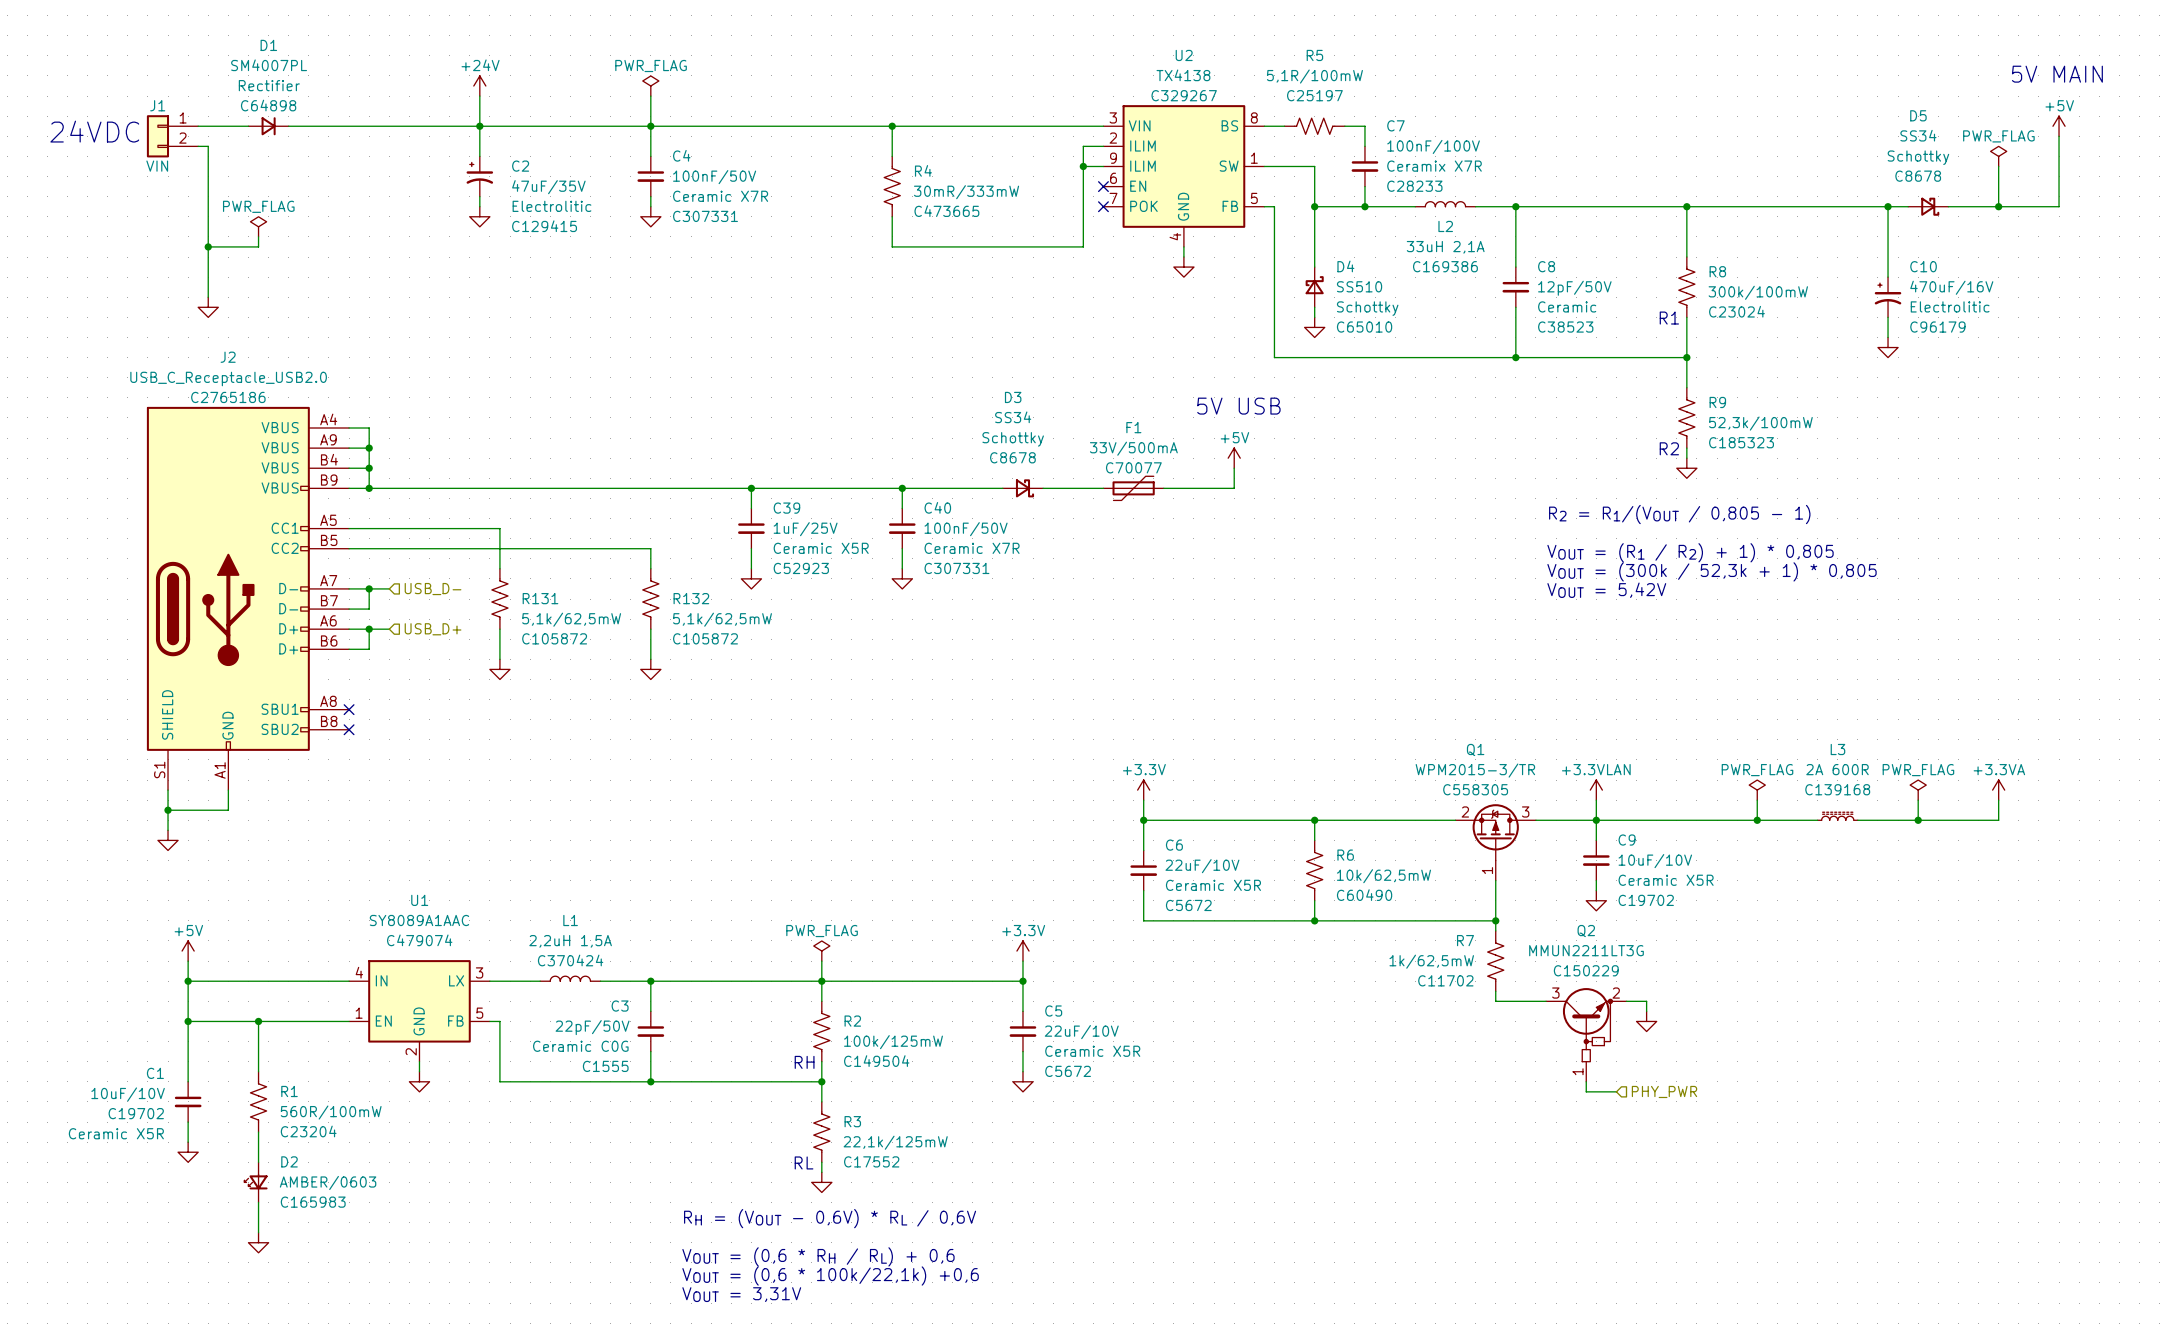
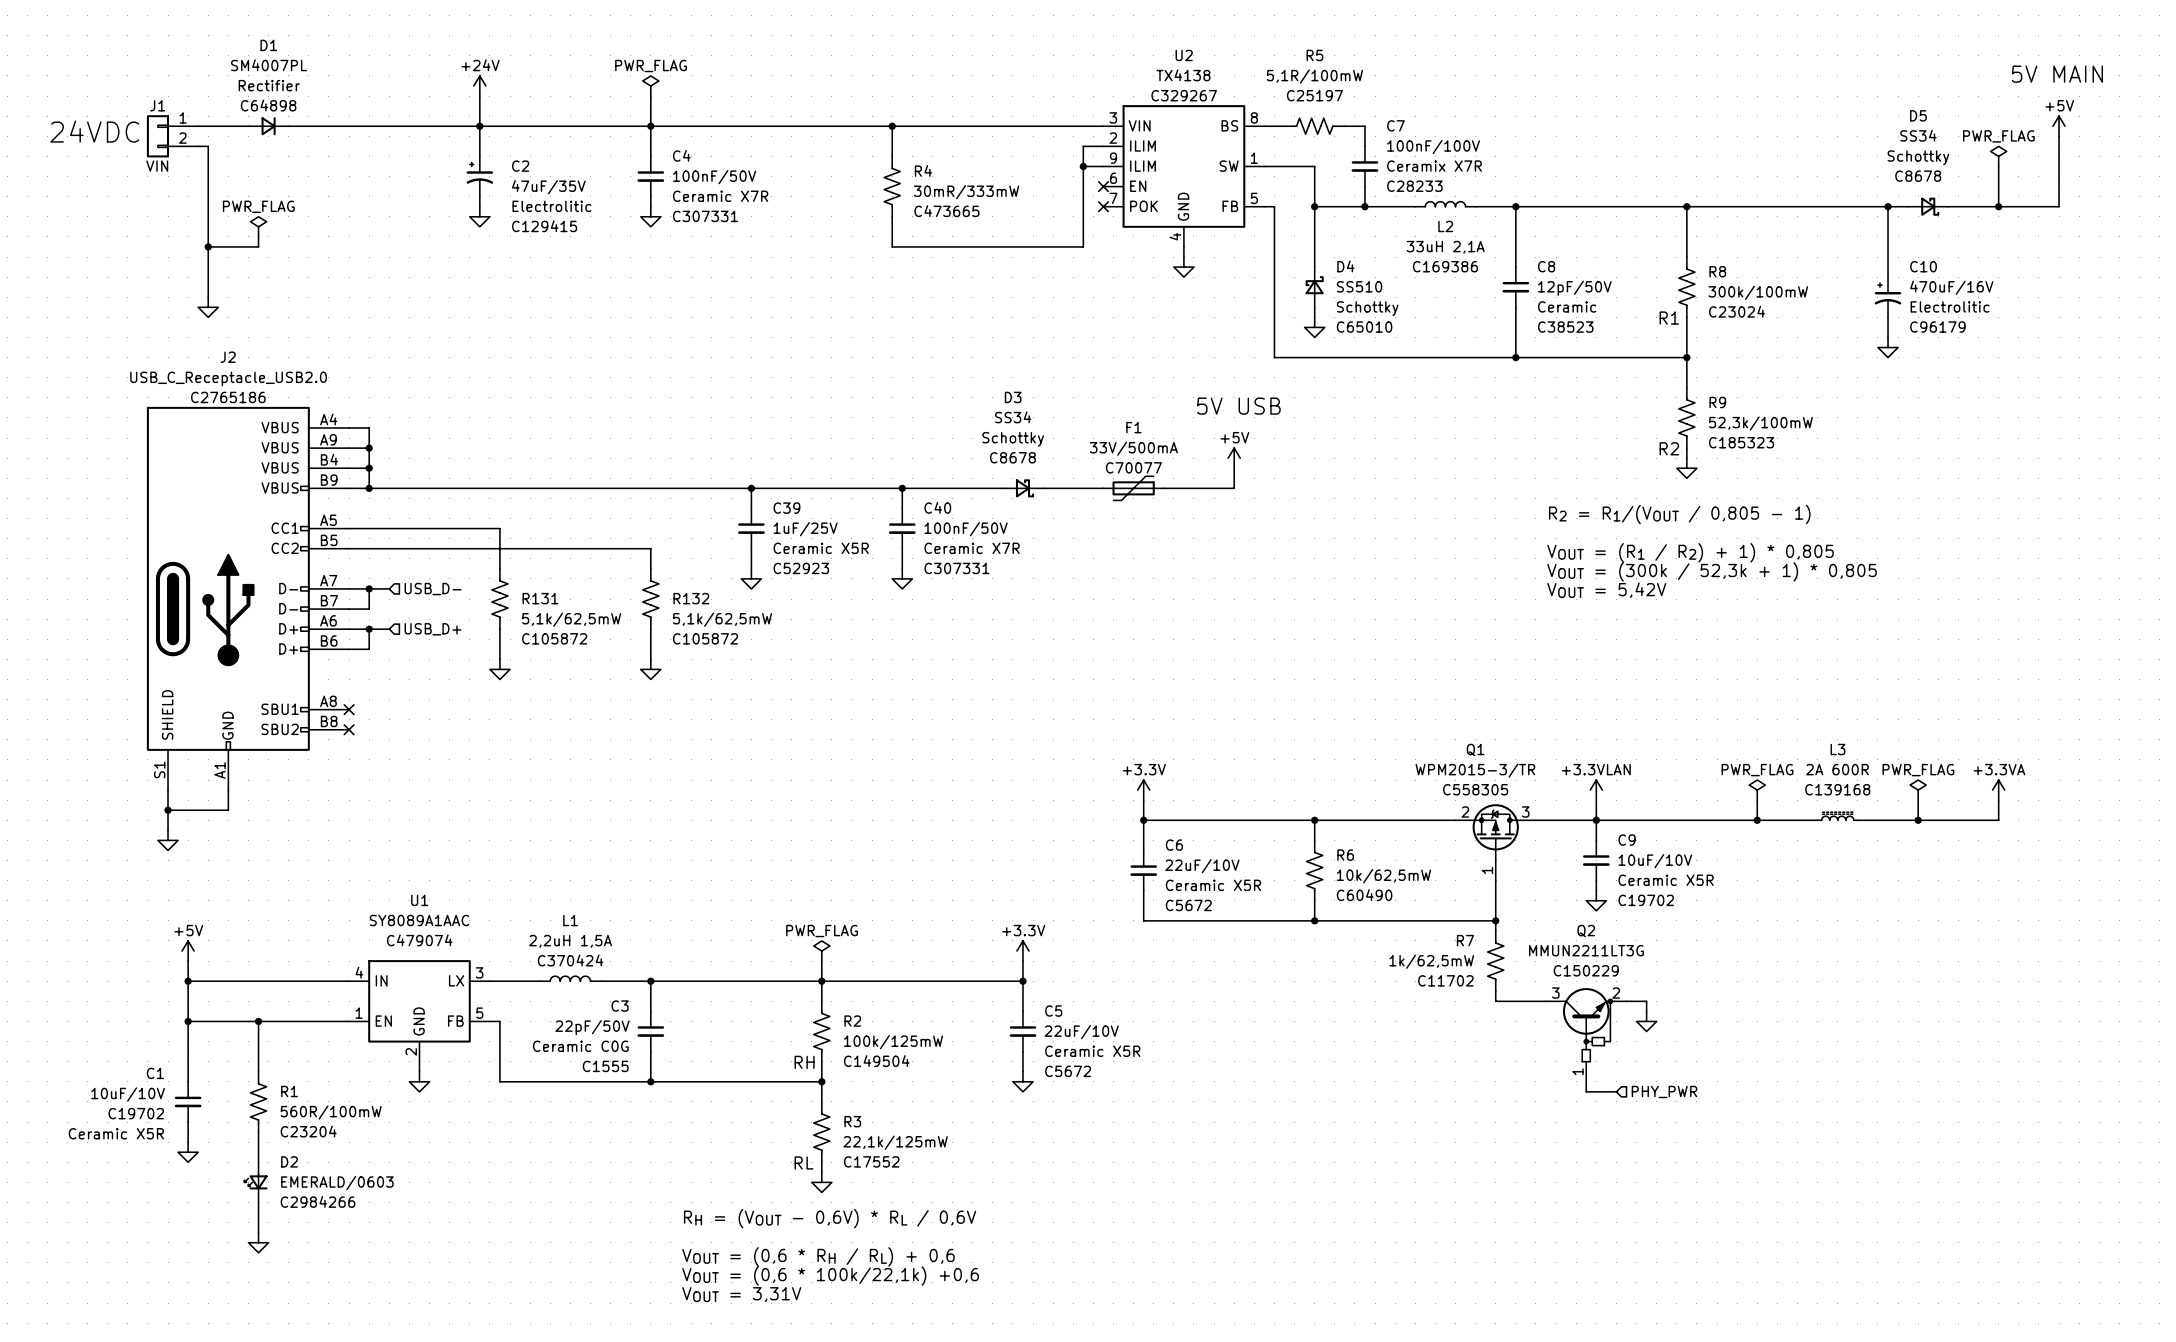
D2 value: AMBER/0603 (328, 1182) -> EMERALD/0603 (337, 1182)
D2 text: C165983 (313, 1202) -> C2984266 (318, 1201)

